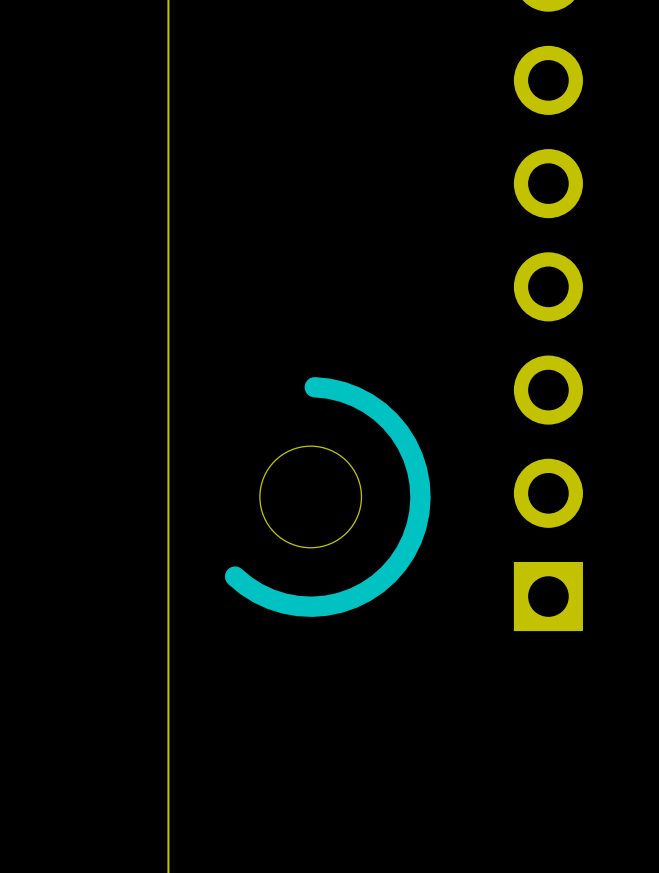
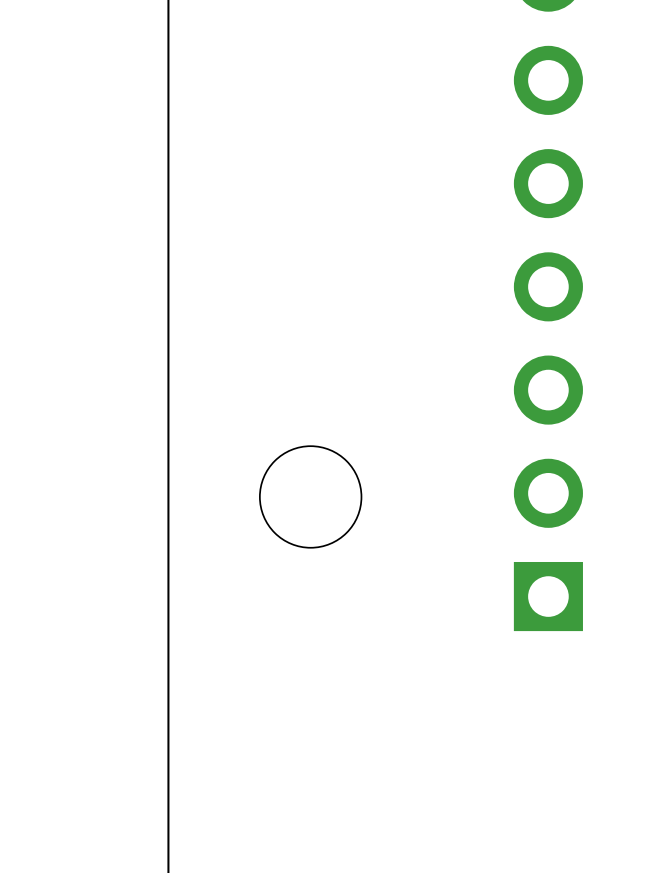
line: (314, 387) (342, 391) (368, 403) (390, 421) (406, 444) (412, 456) (419, 484) (419, 512) (411, 539) (397, 563) (377, 583) (353, 598) (326, 605) (298, 606) (270, 599) (245, 585) (235, 576) -> none

